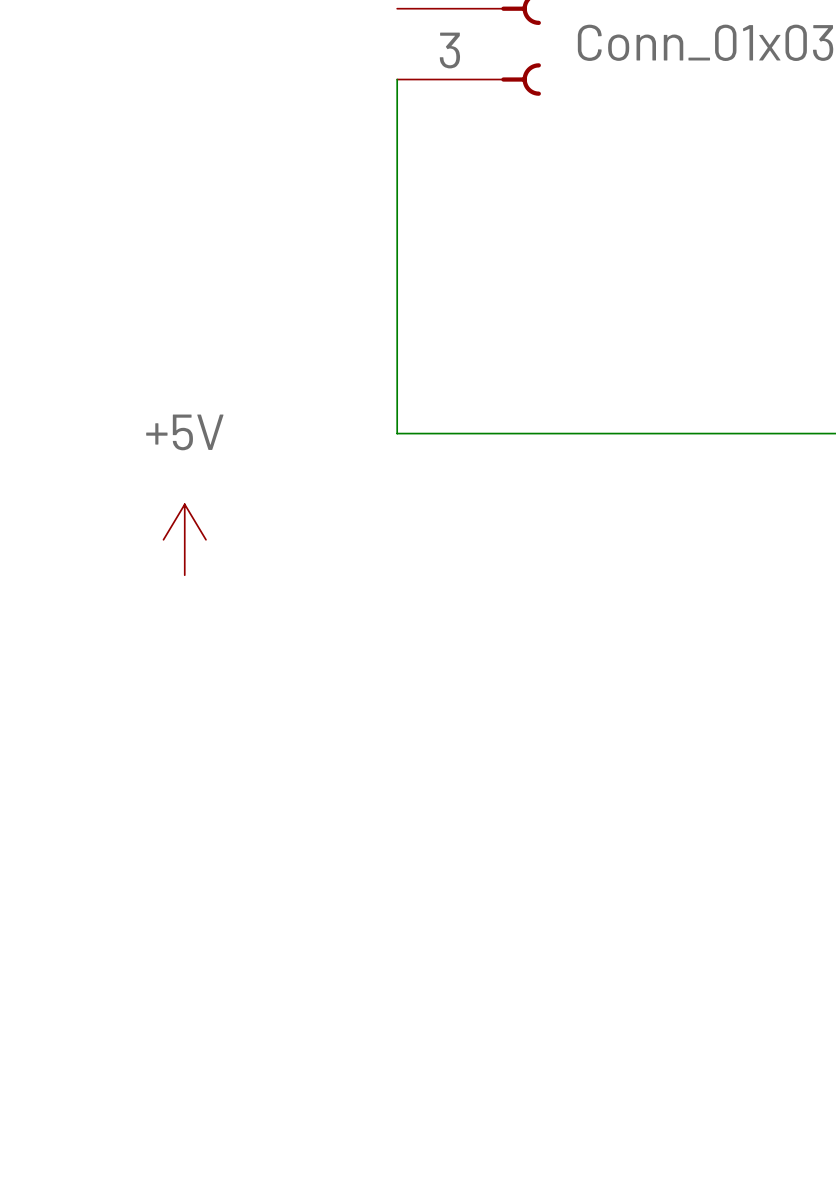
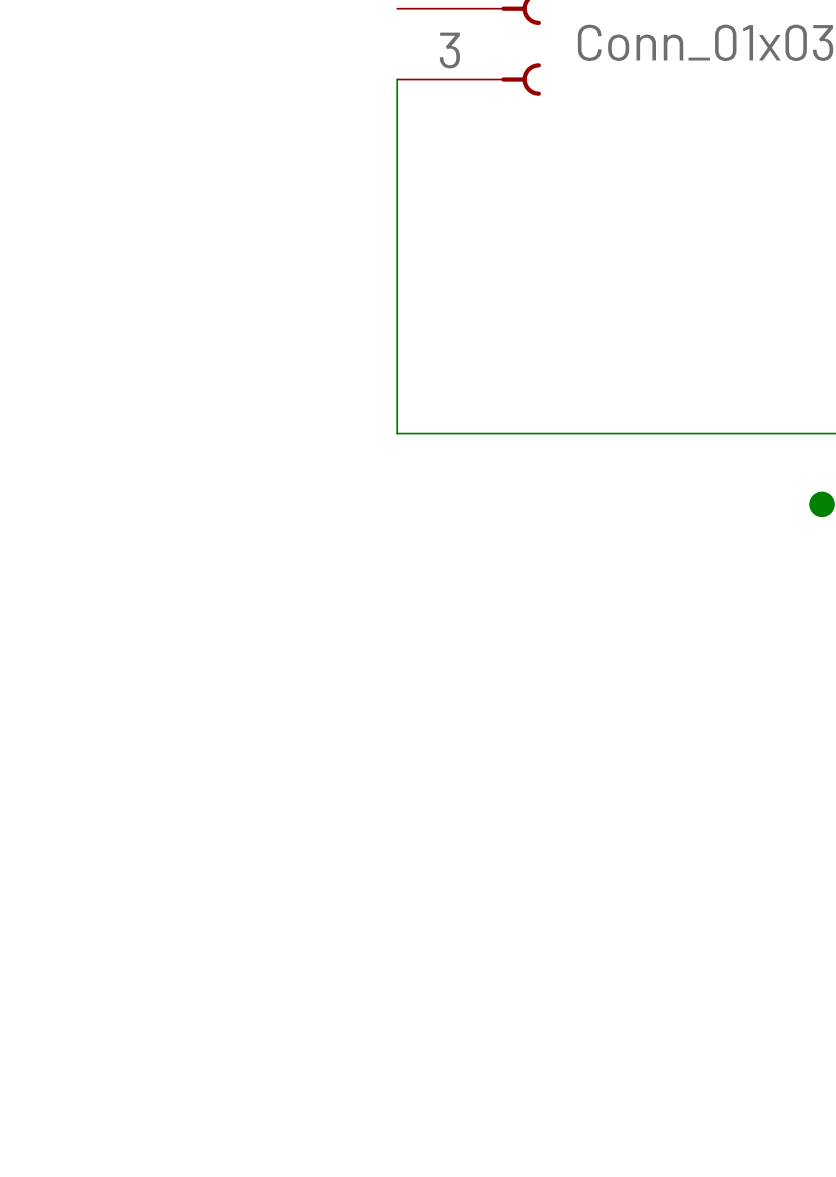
junction: none -> (822, 504)
power symbol: +5V (184, 539) -> none

